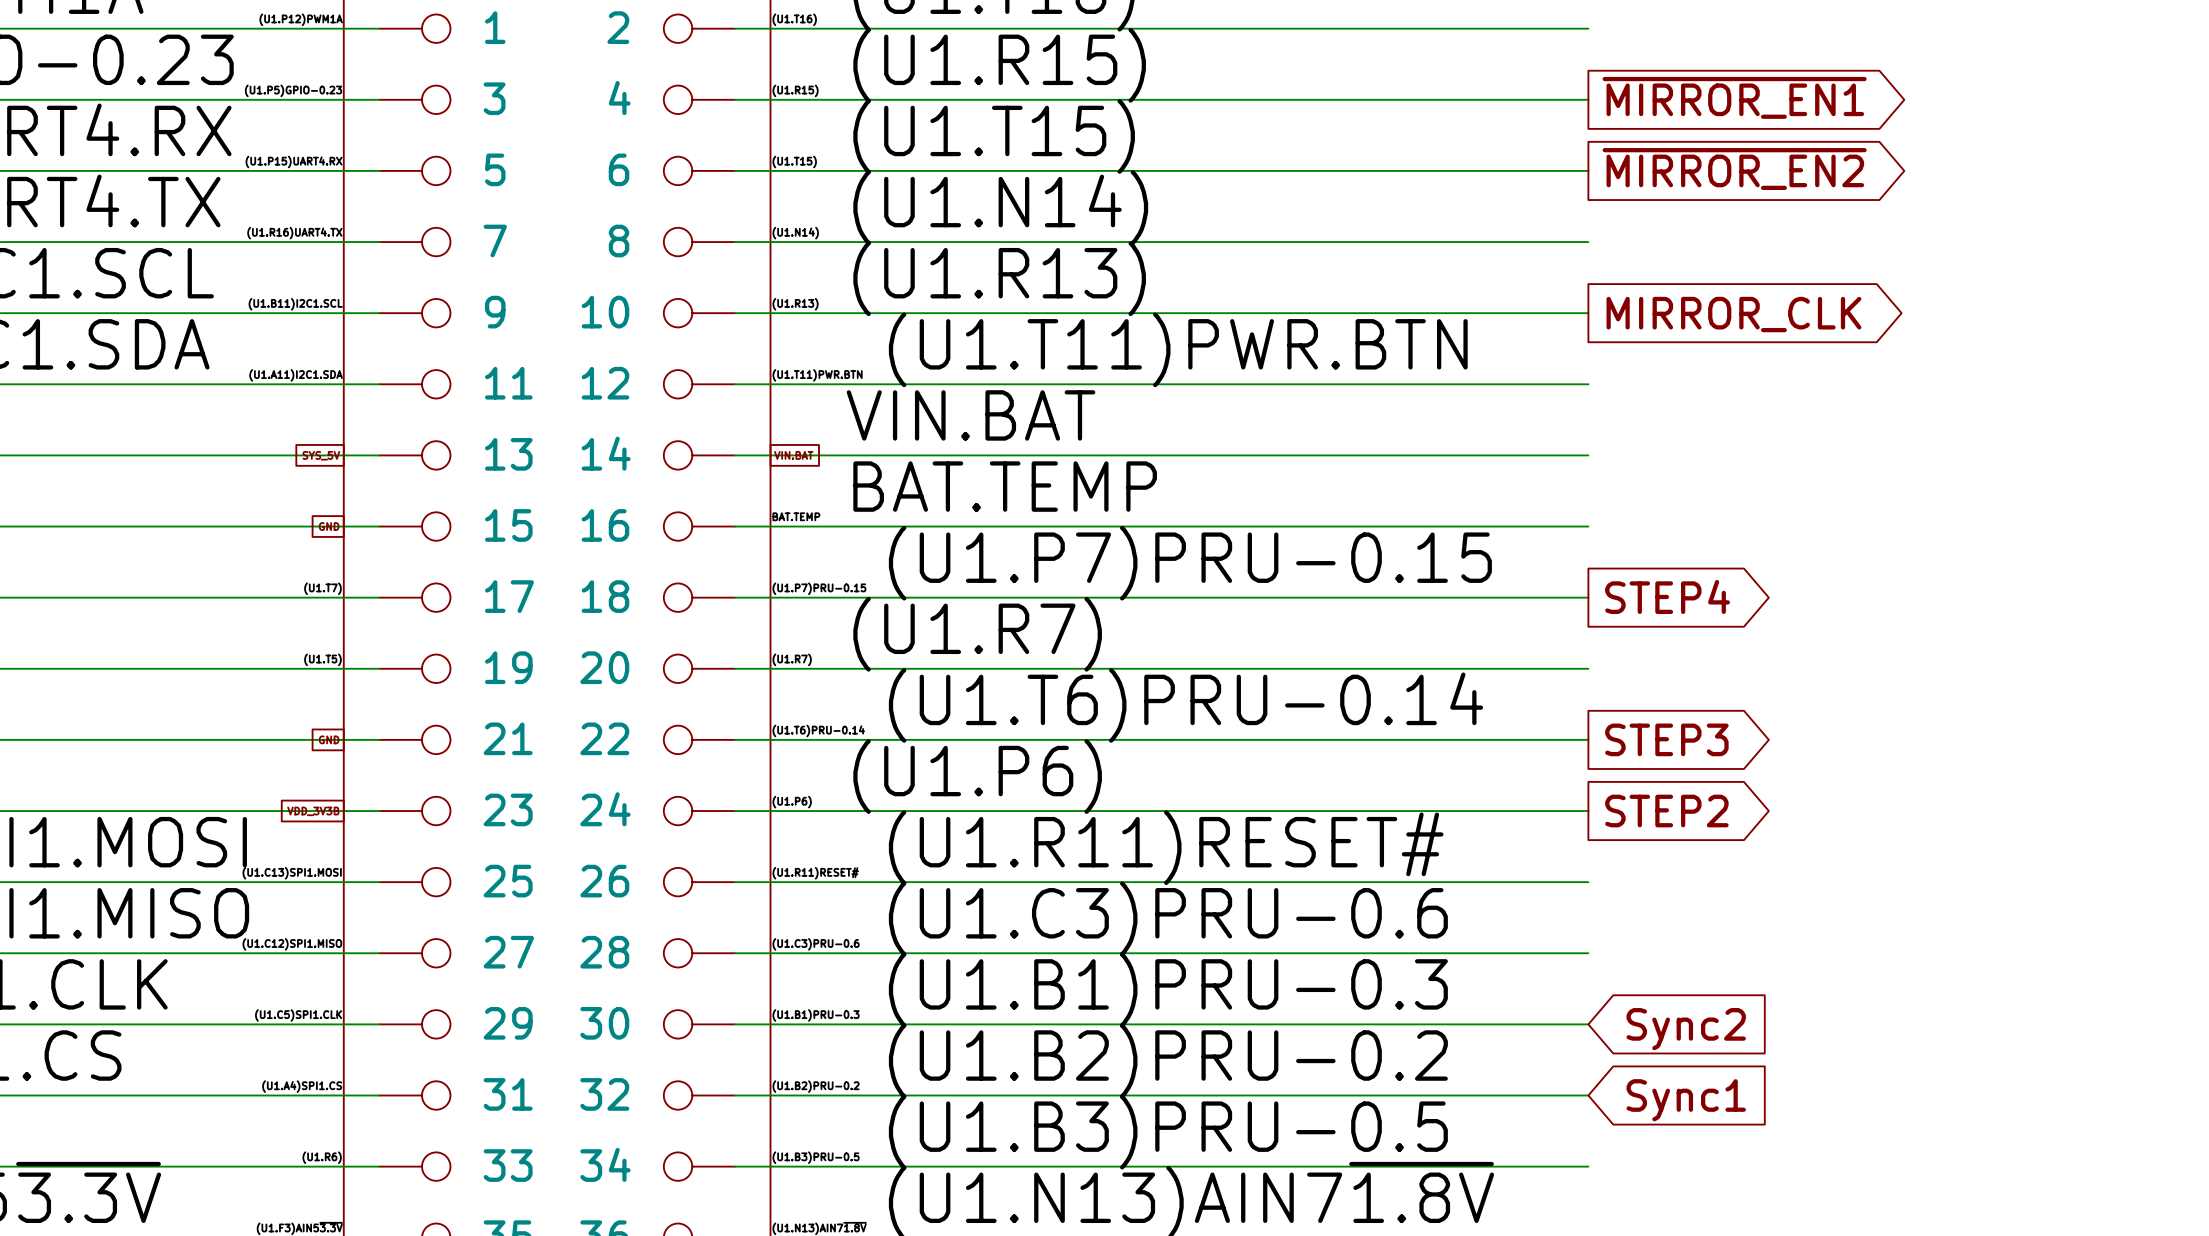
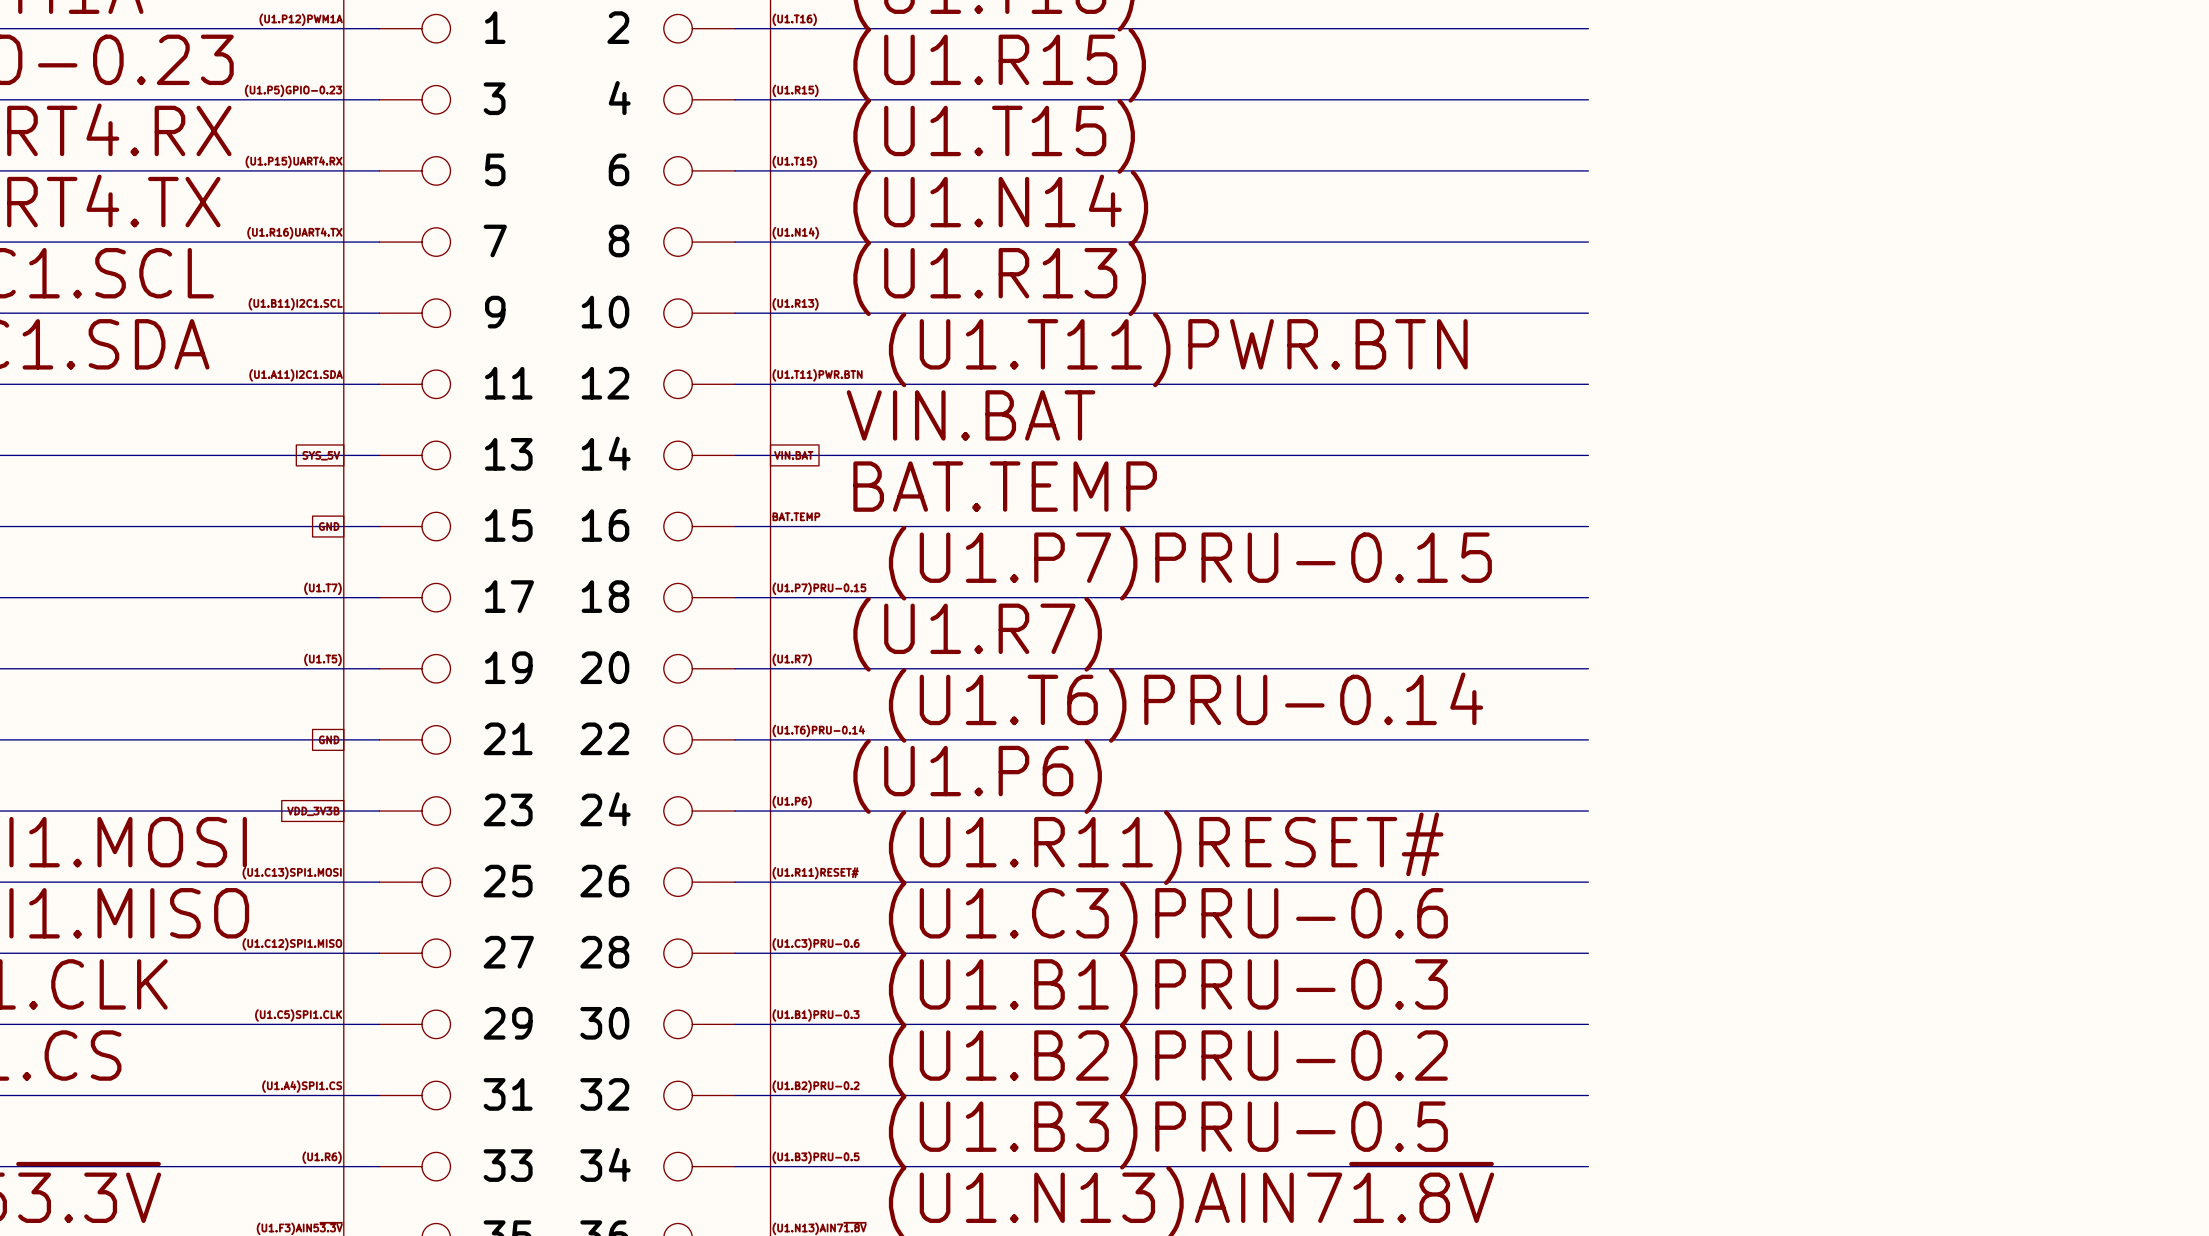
global label: ~{MIRROR_EN1} (1734, 97) -> none
global label: ~{MIRROR_EN2} (1734, 169) -> none
global label: MIRROR_CLK (1733, 314) -> none
global label: STEP4 (1667, 596) -> none
global label: STEP3 (1666, 739) -> none
global label: STEP2 (1666, 811) -> none
global label: Sync2 (1686, 1029) -> none
global label: Sync1 (1686, 1100) -> none

